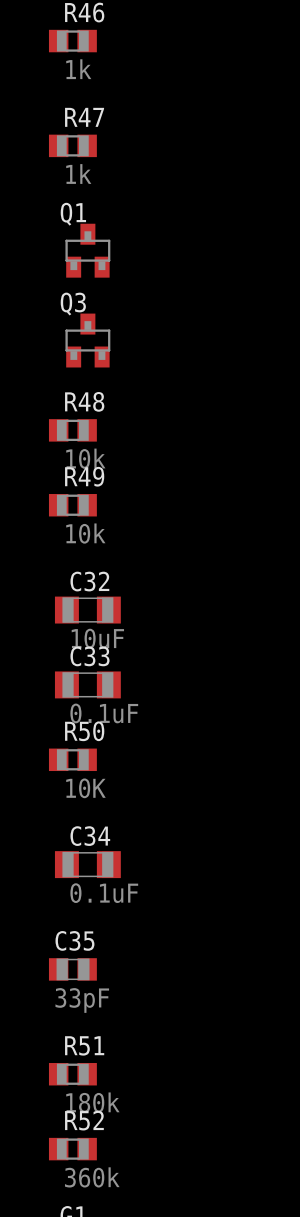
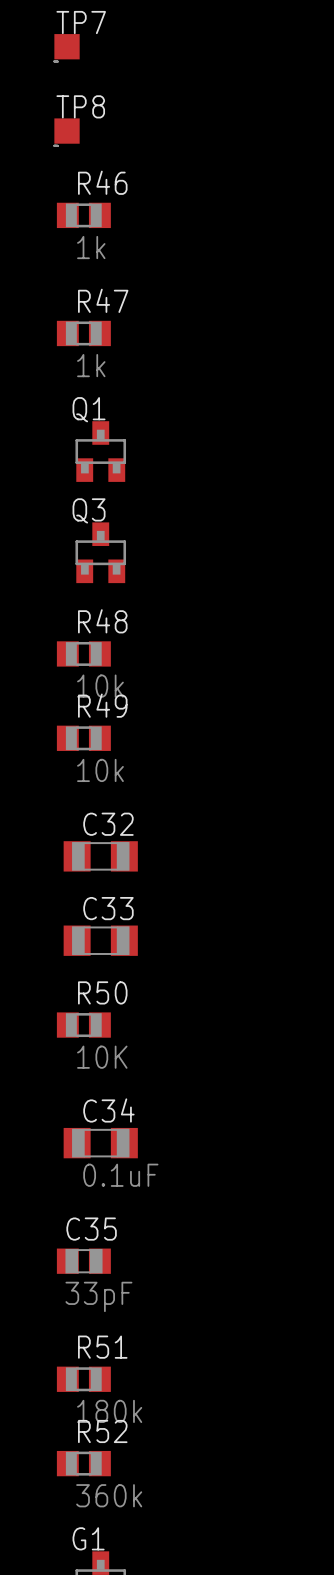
C32 value: 10uF (97, 638) -> none
C33 value: 0.1uF (104, 713) -> none

